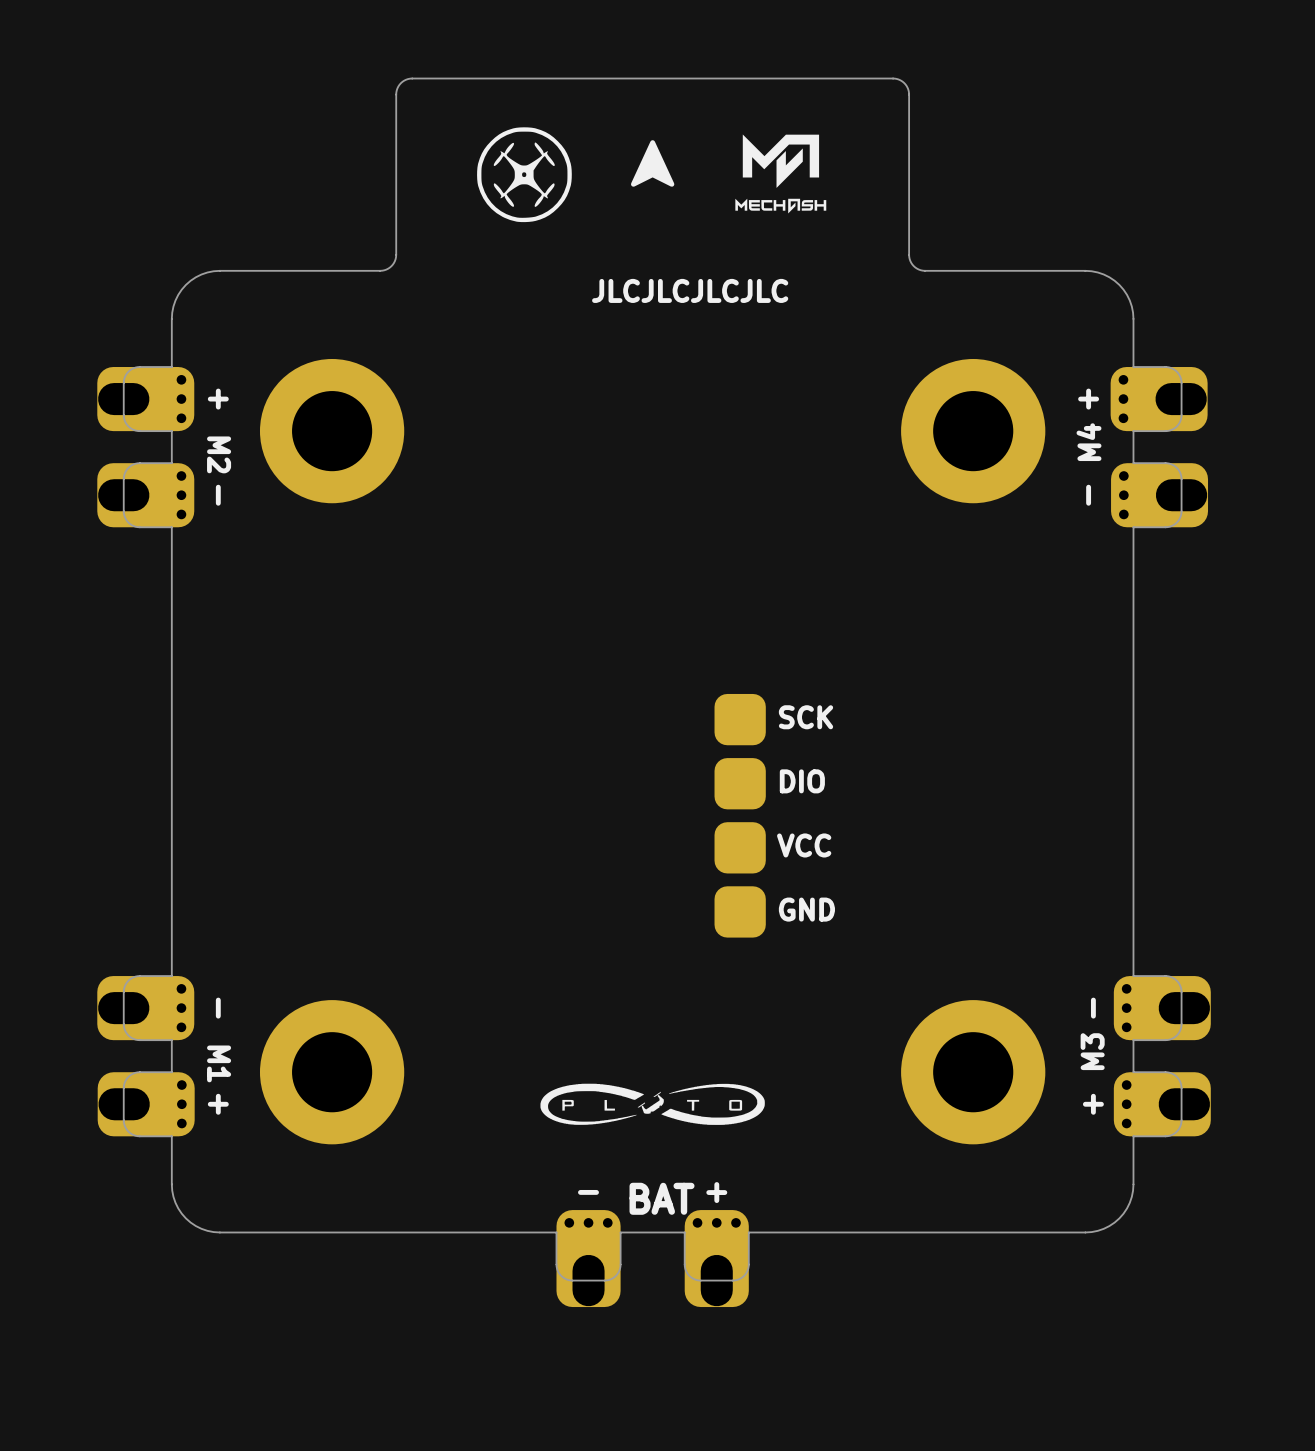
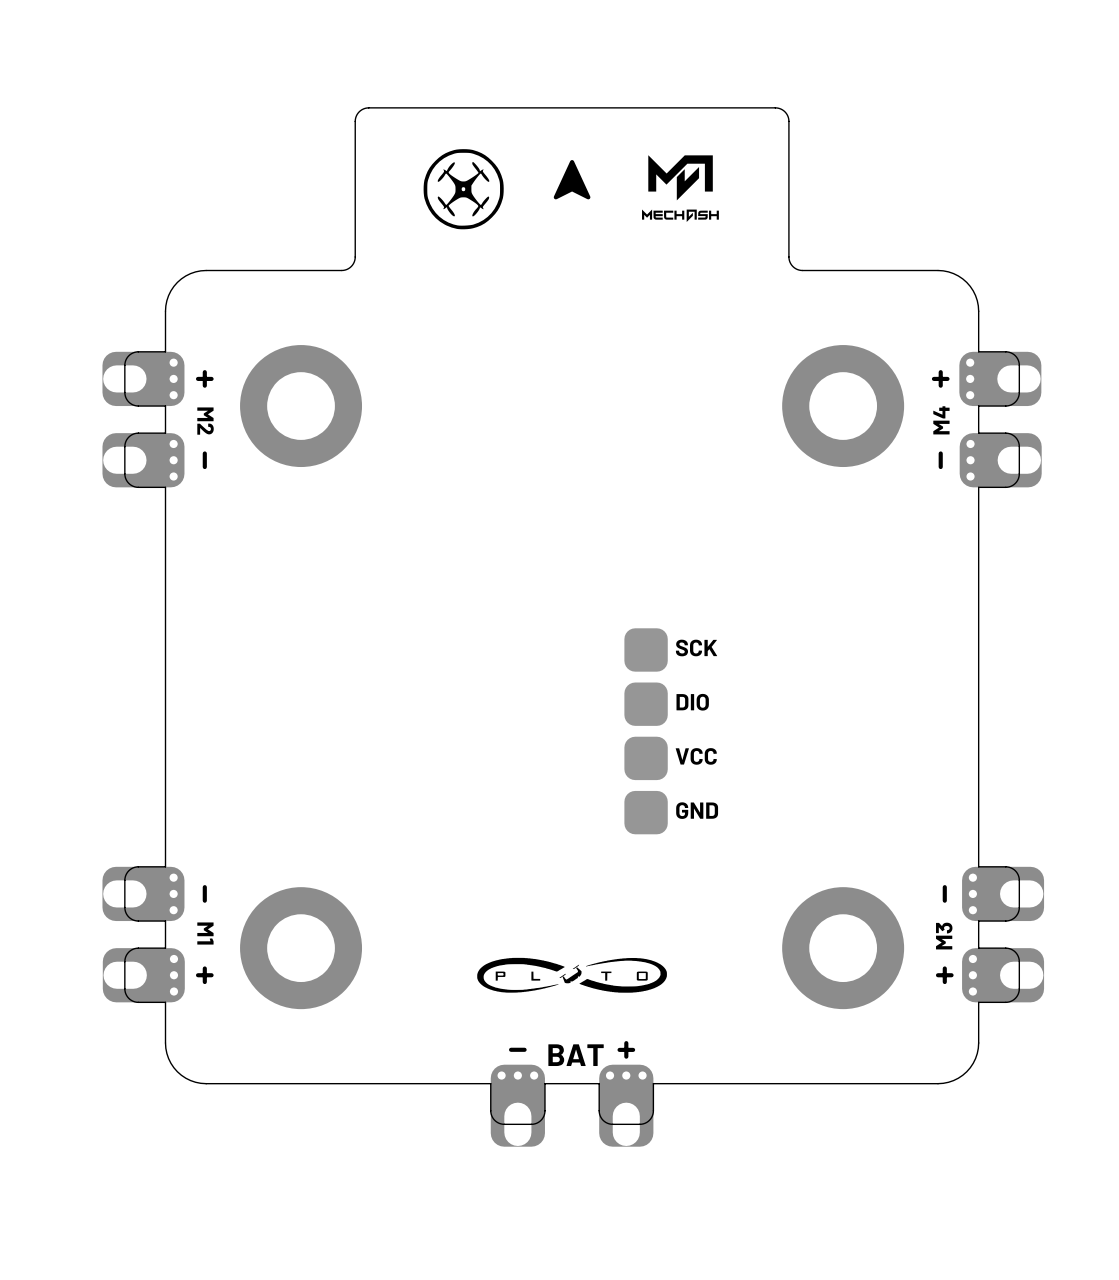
text: JLCJLCJLCJLC (690, 290) -> none

